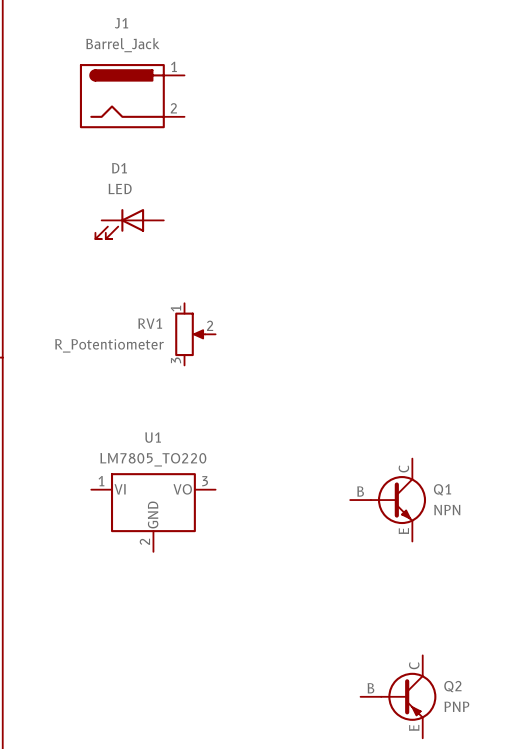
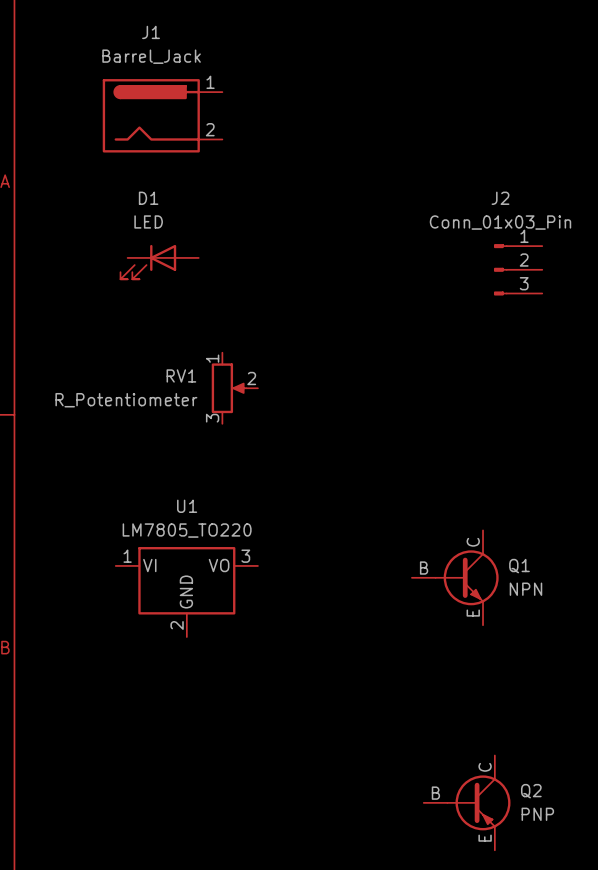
J2: none -> Conn_01x03_Pin (518, 269)

